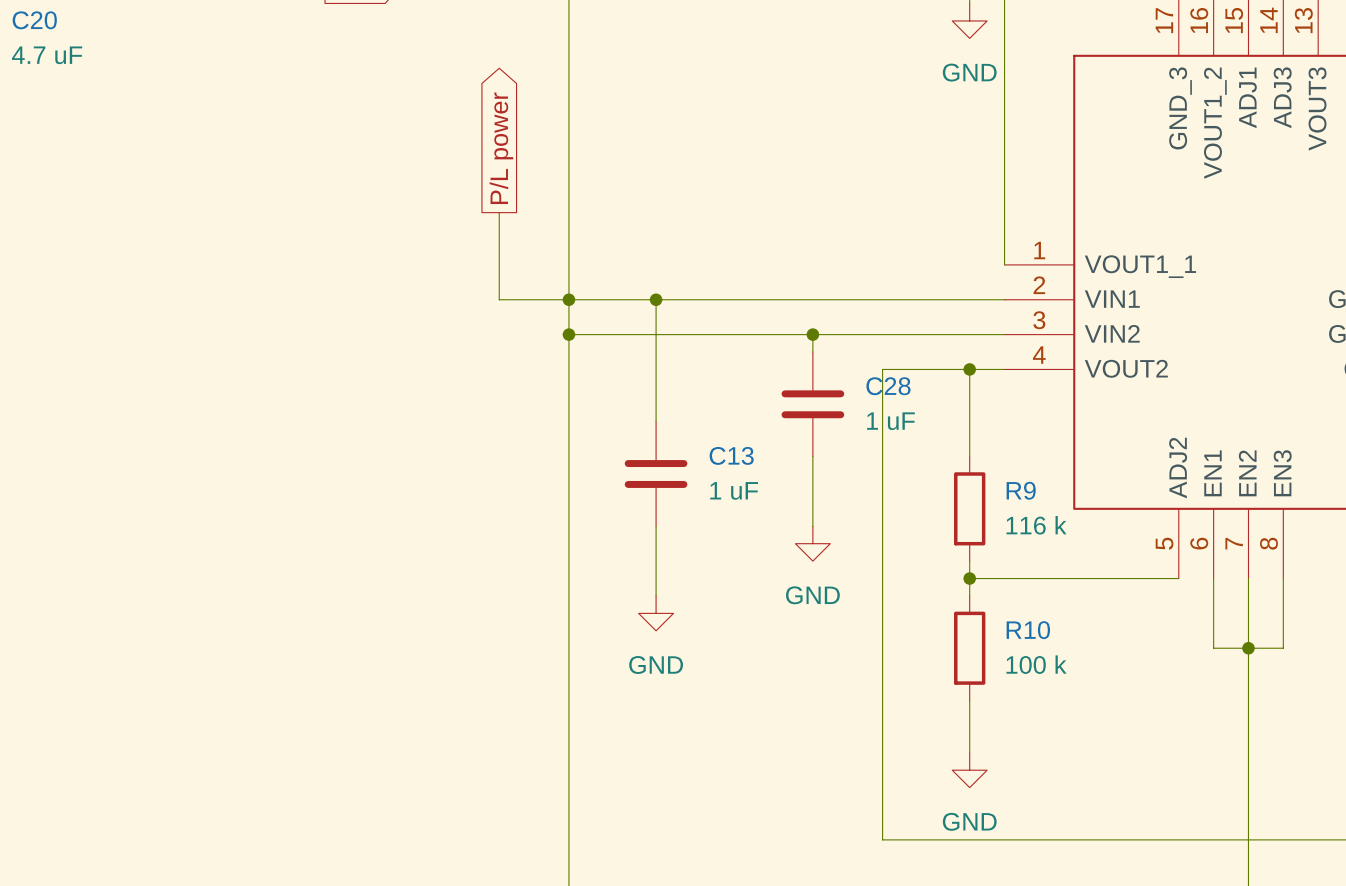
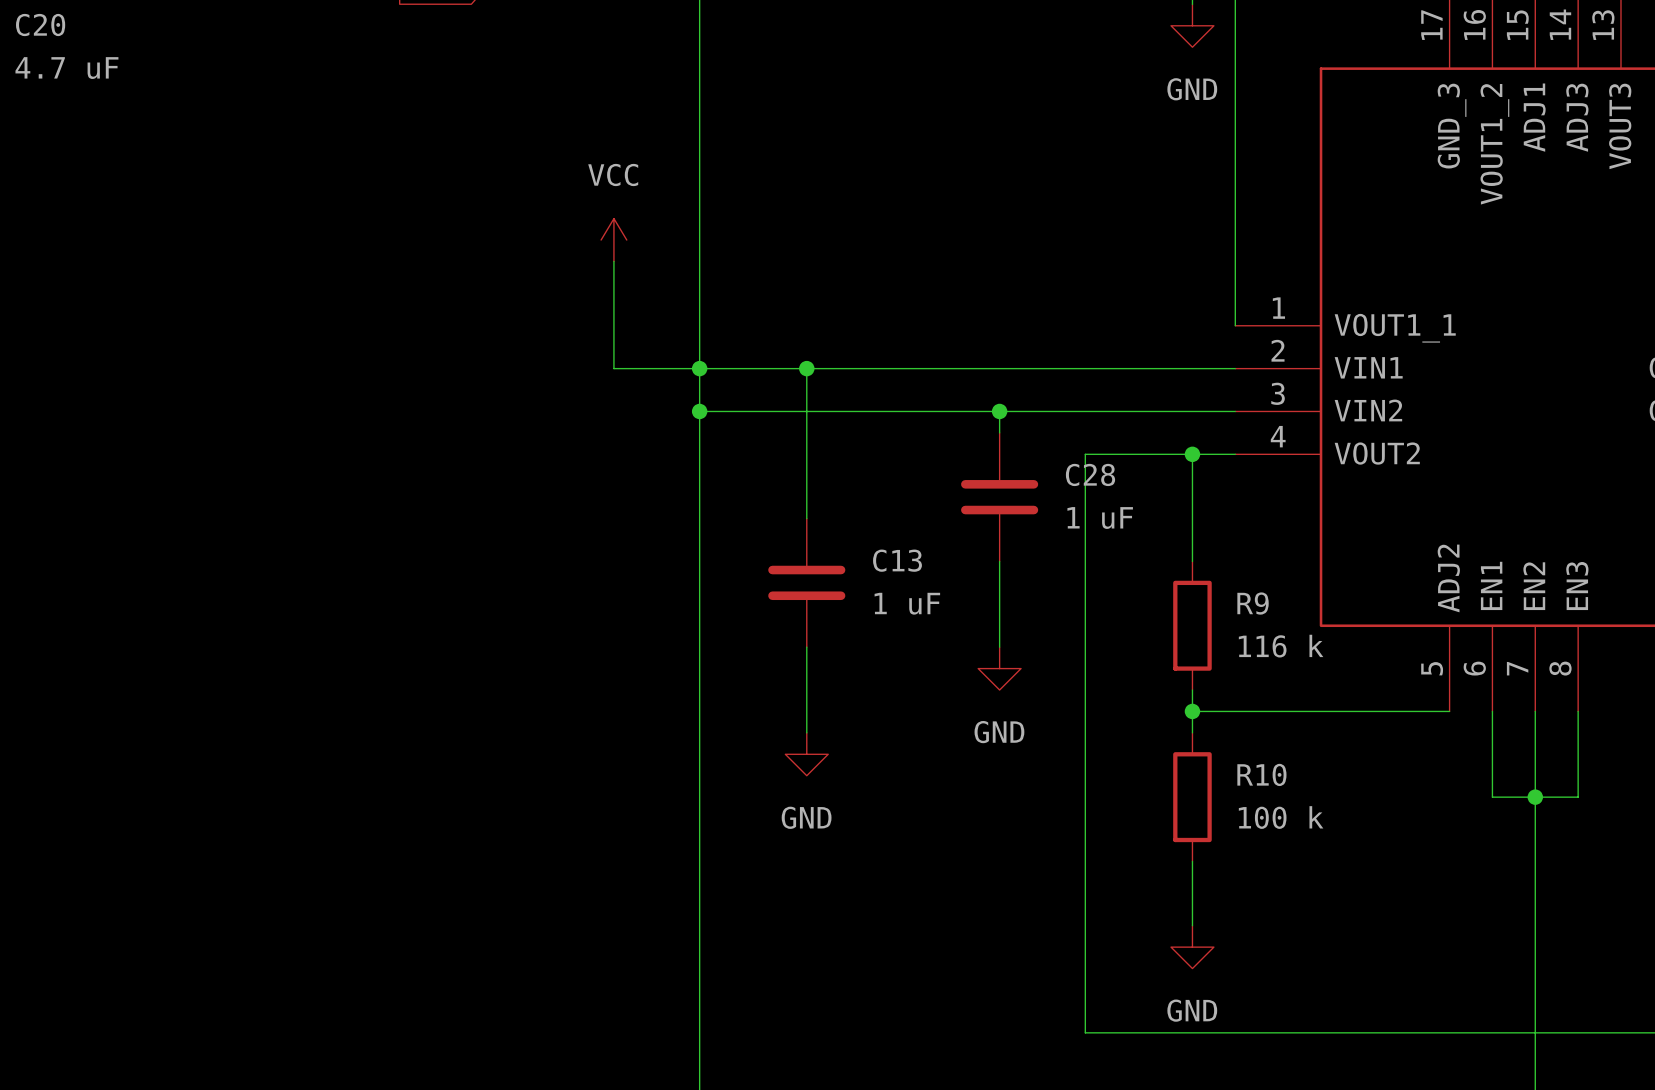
global label: P/L power (501, 148) -> none
power symbol: none -> VCC (613, 240)

